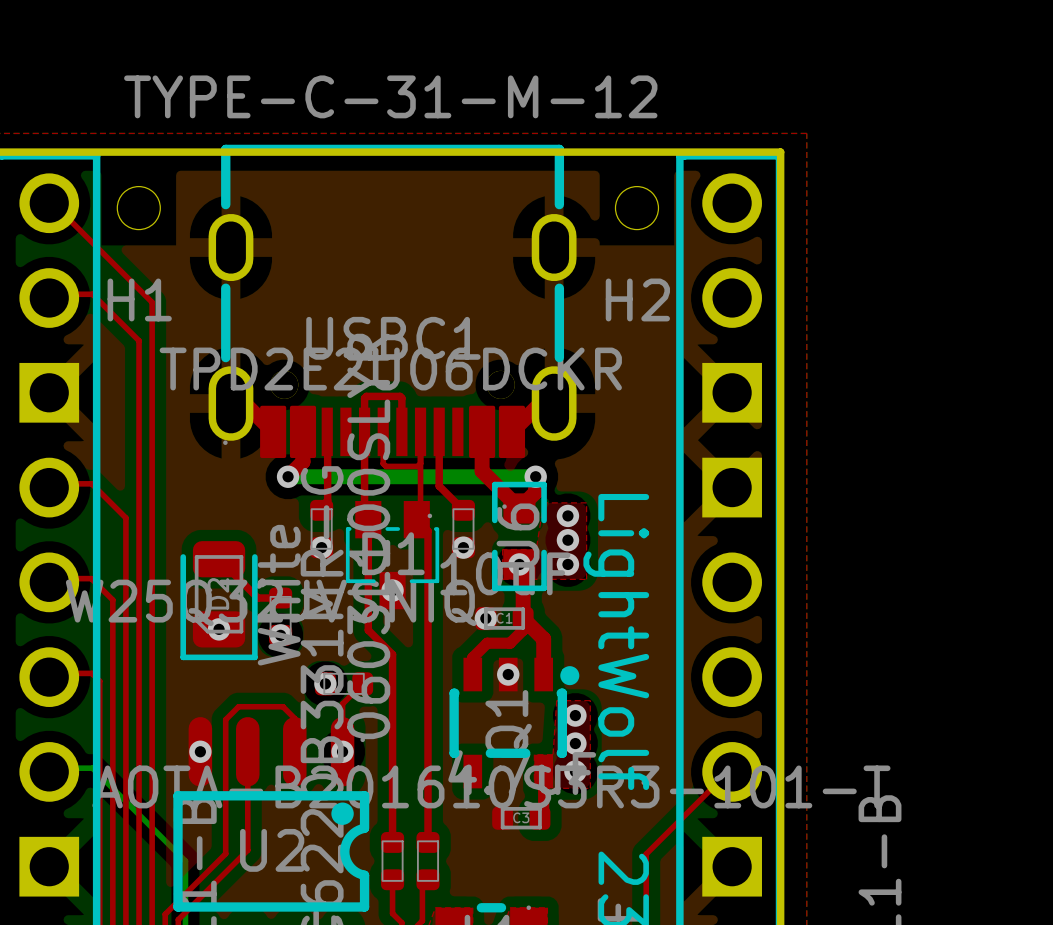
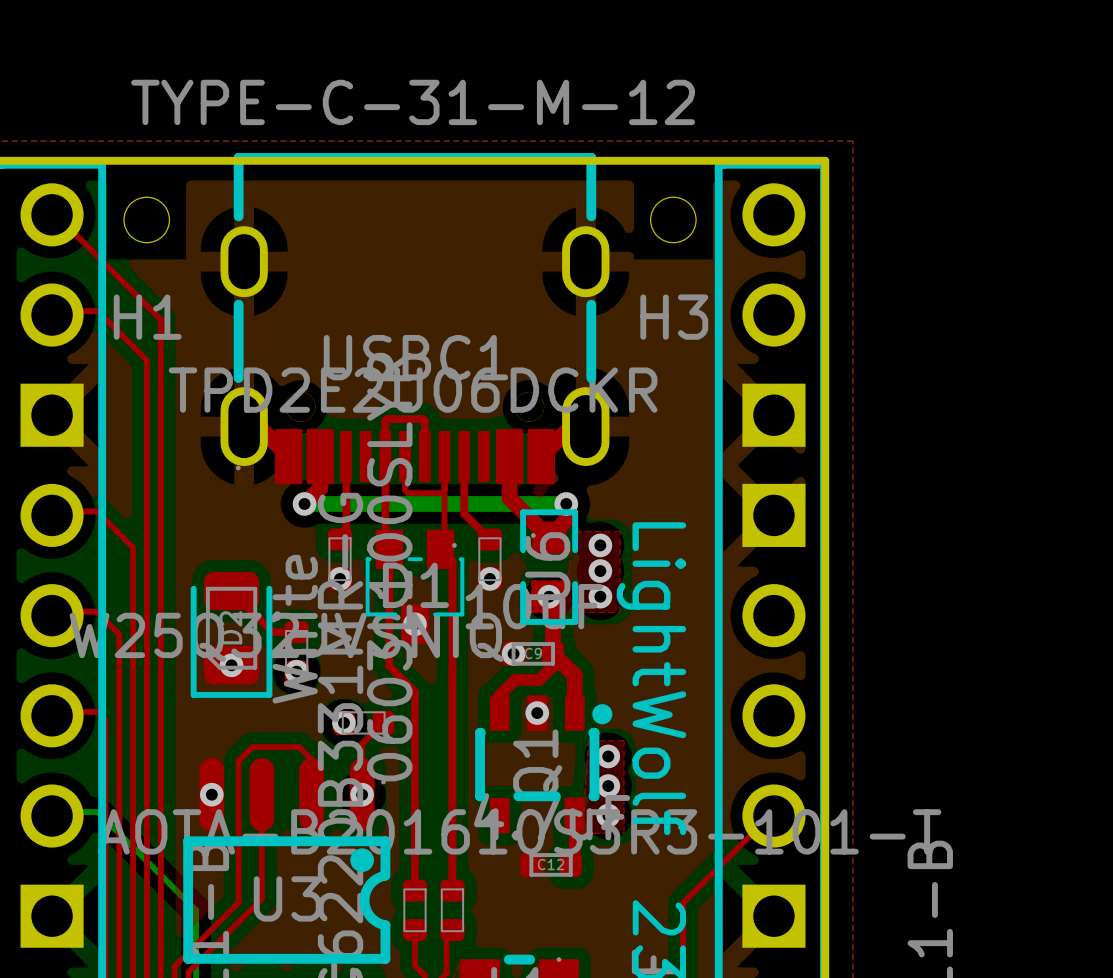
H2 name: H2 (637, 299) -> H3 (674, 317)
C1 name: C1 (504, 618) -> C9 (533, 653)
C3 name: C3 (521, 817) -> C12 (551, 864)
U2 name: U2 (272, 850) -> U3 (287, 898)

